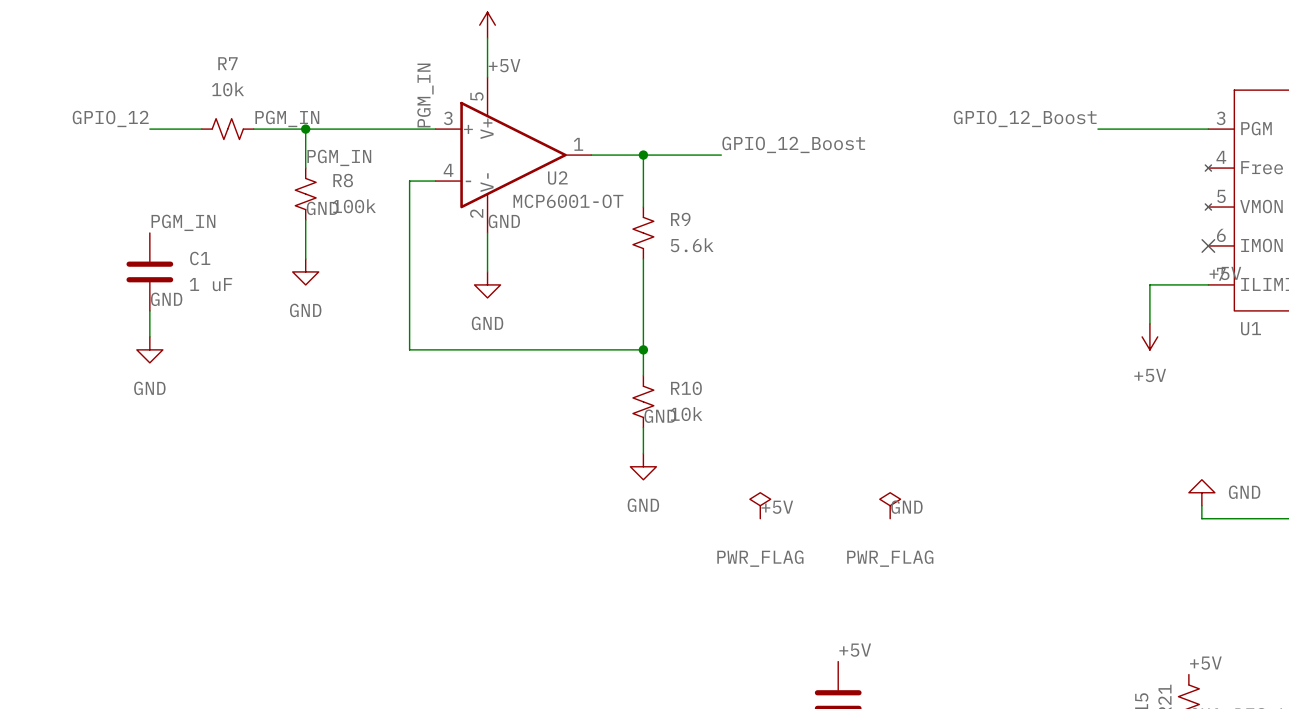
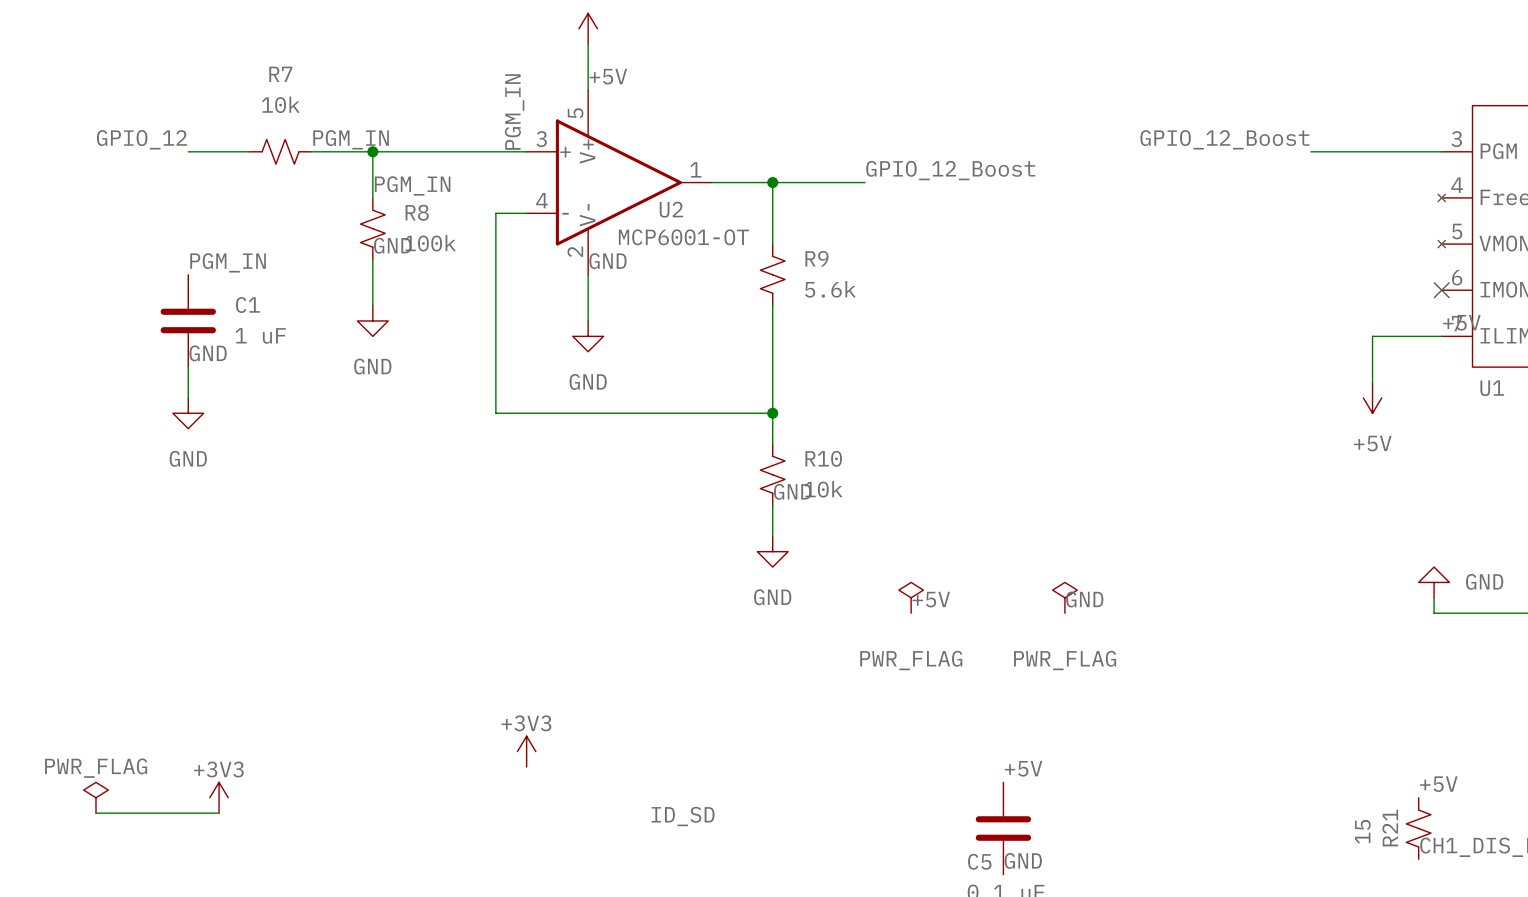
power symbol: none -> +3V3 (526, 751)
power symbol: none -> PWR_FLAG (95, 797)
power symbol: none -> +3V3 (219, 797)
wire: none -> (95, 813) (219, 813)
label: none -> ID_SD (683, 816)

